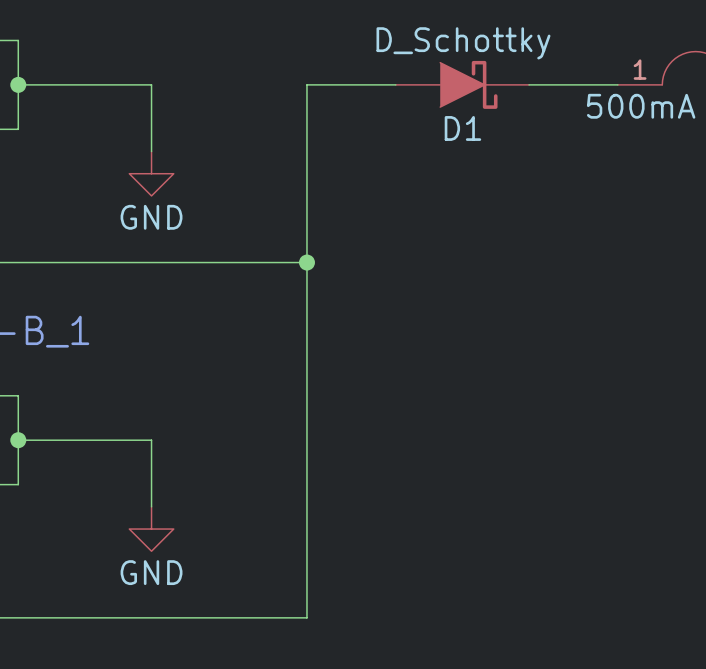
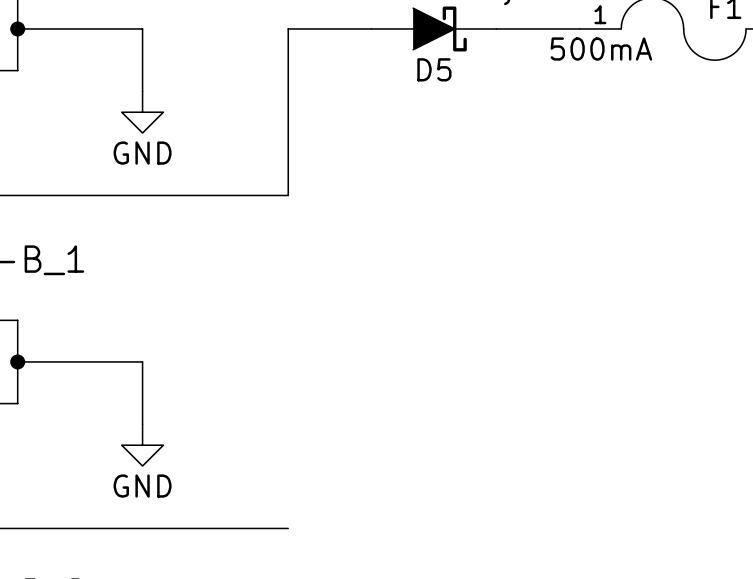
D1 name: D1 (462, 128) -> D5 (434, 69)
wire: (306, 262) (306, 617) -> none
junction: (306, 262) -> none

